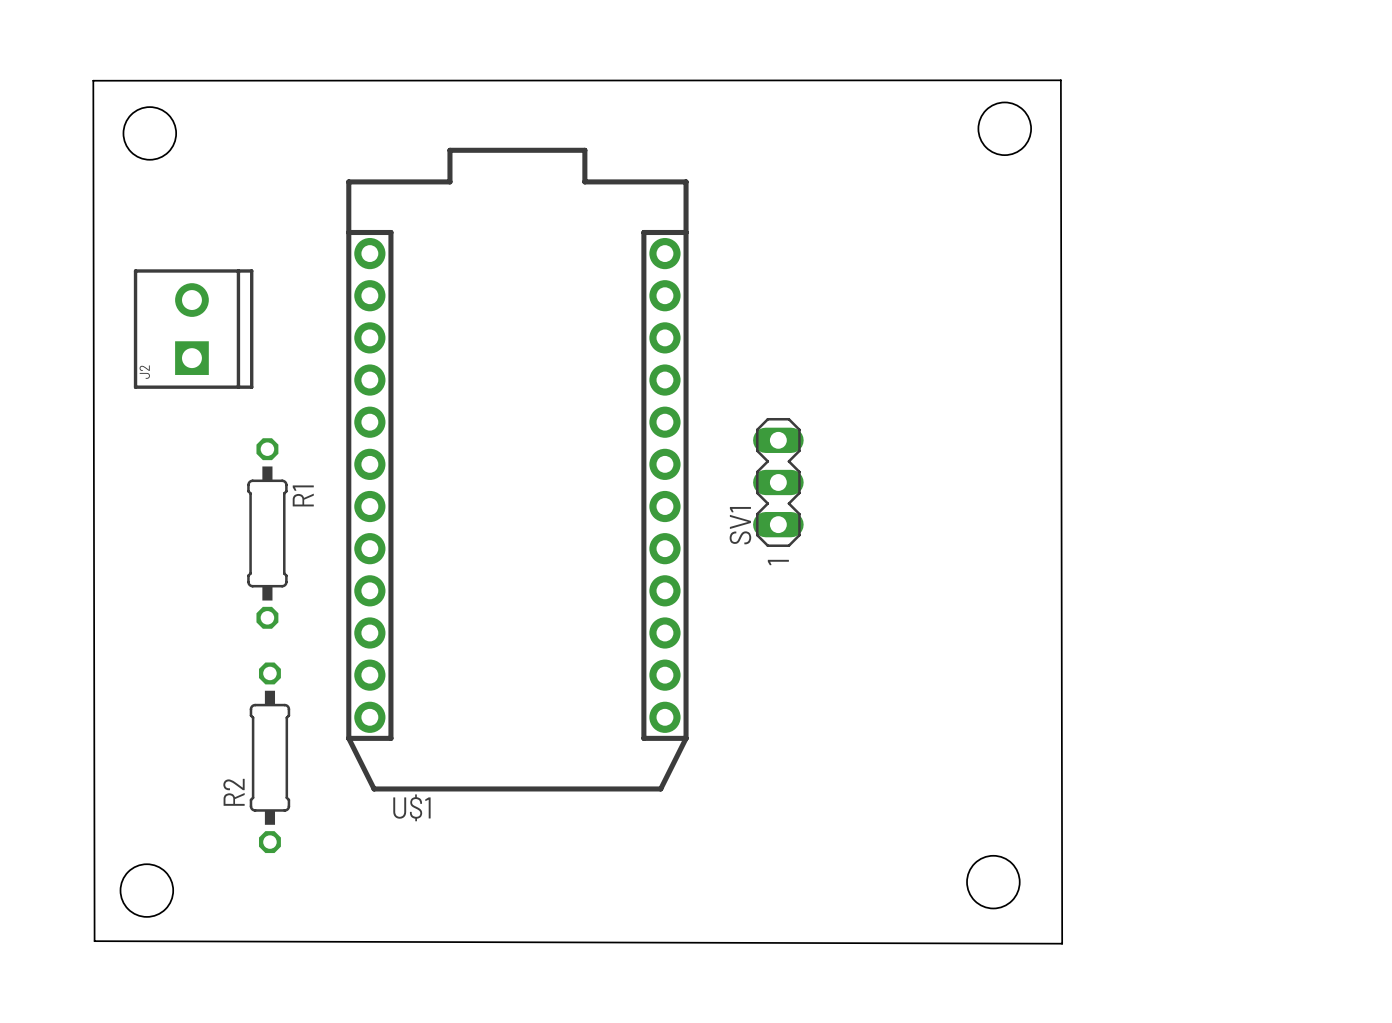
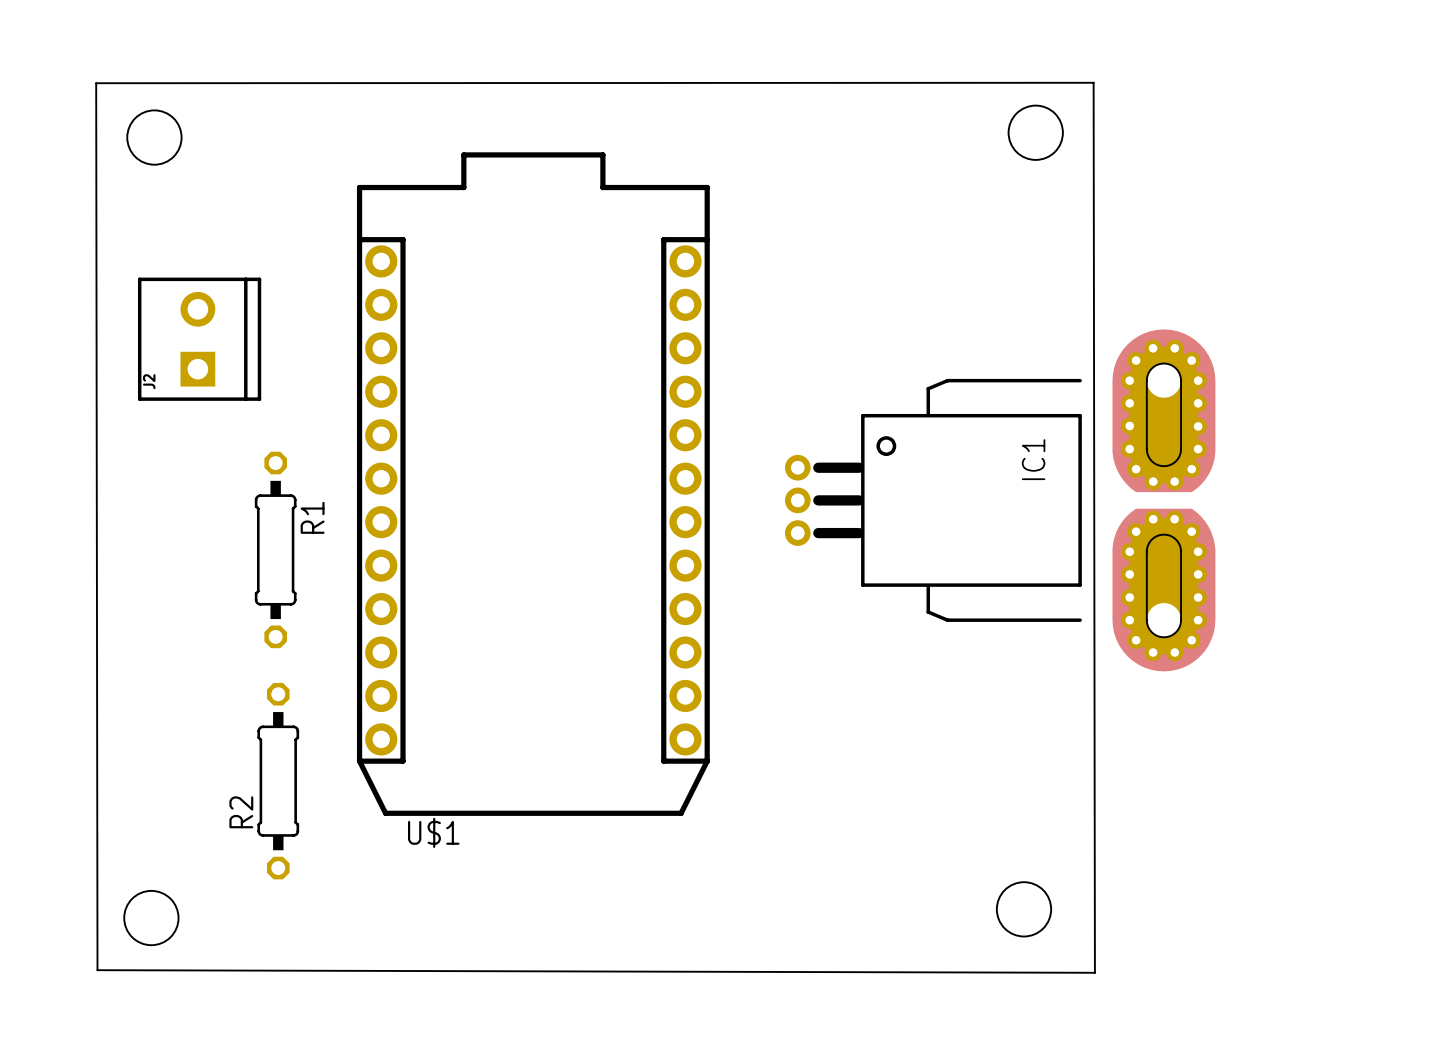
SV1: (778, 482) -> none
IC1: none -> (1000, 500)

